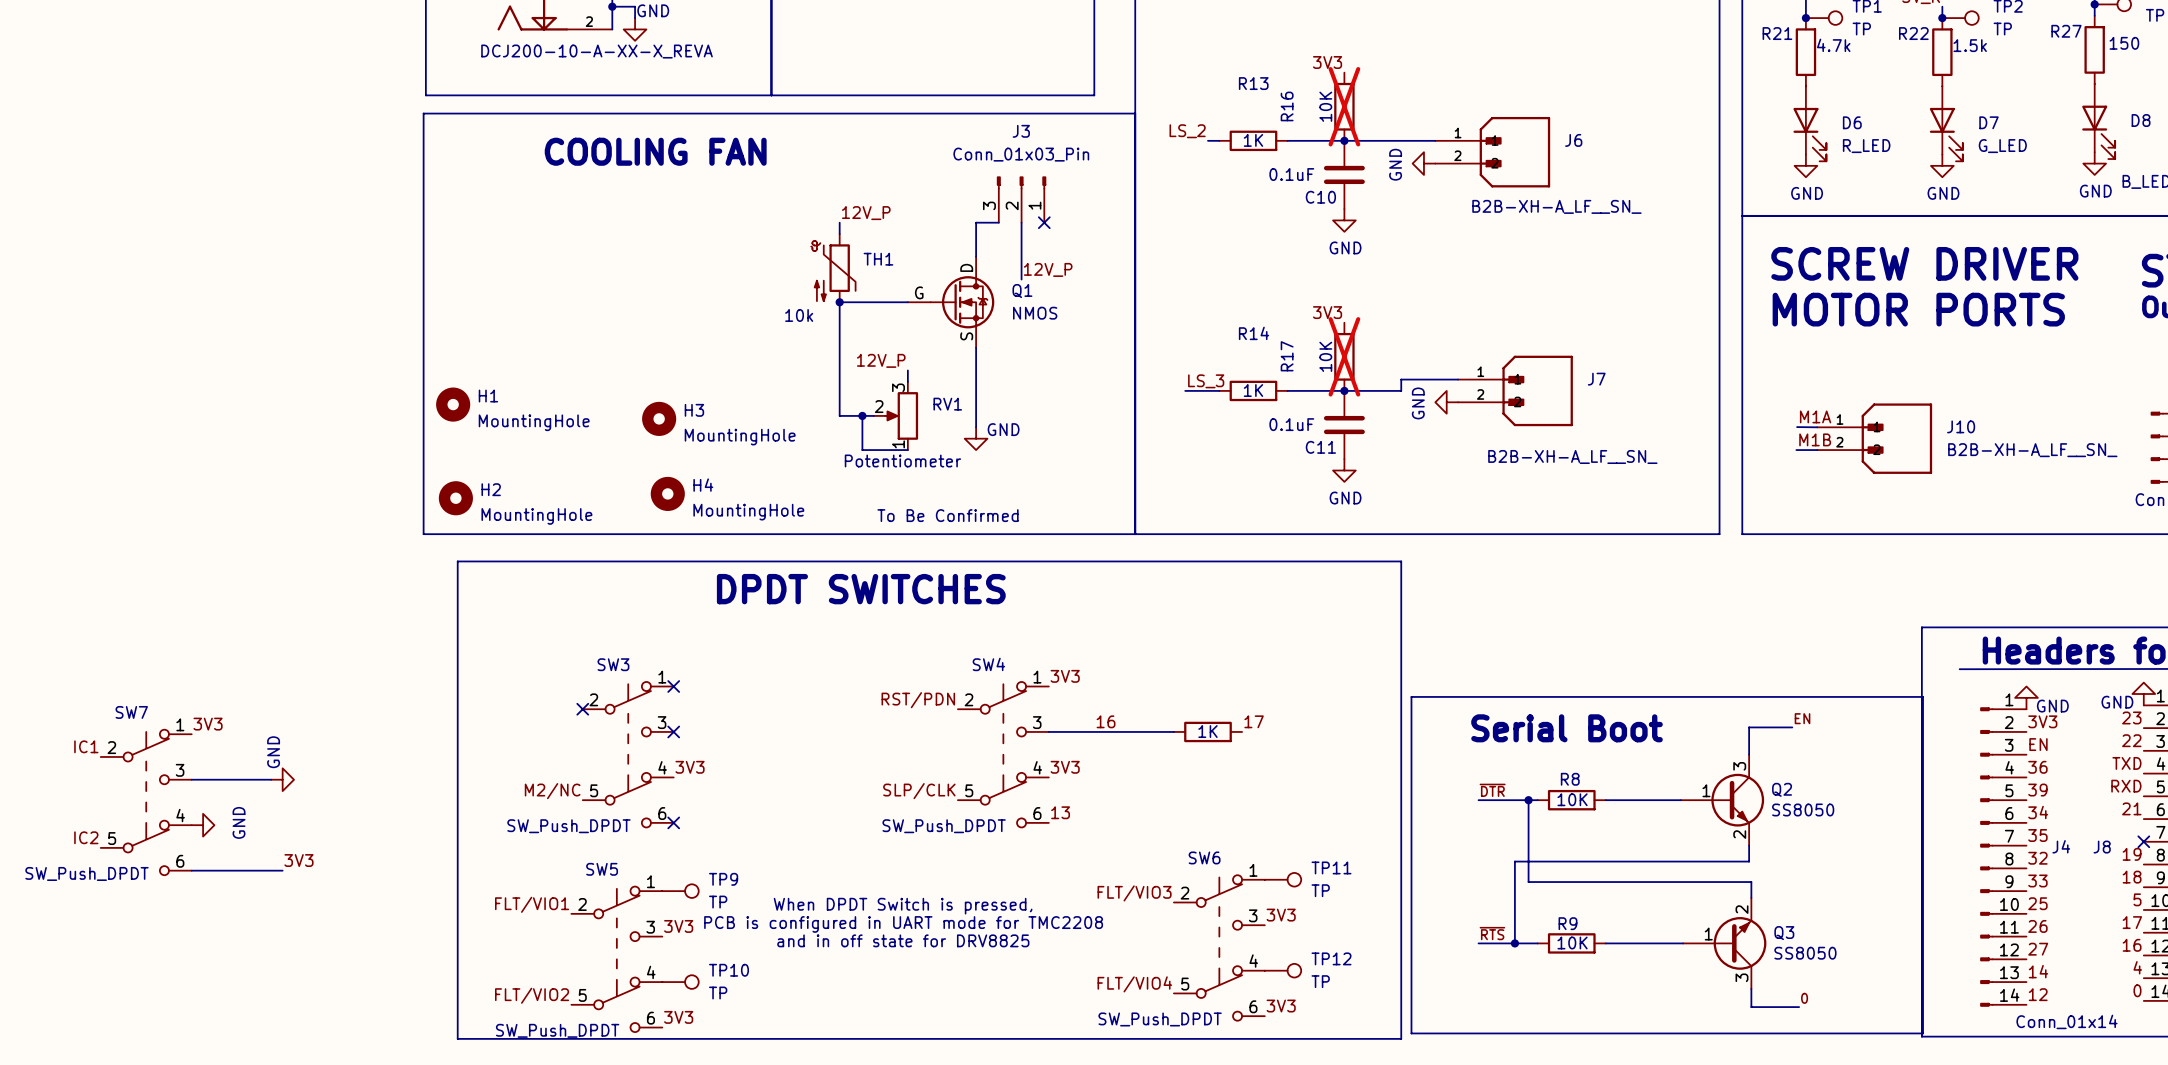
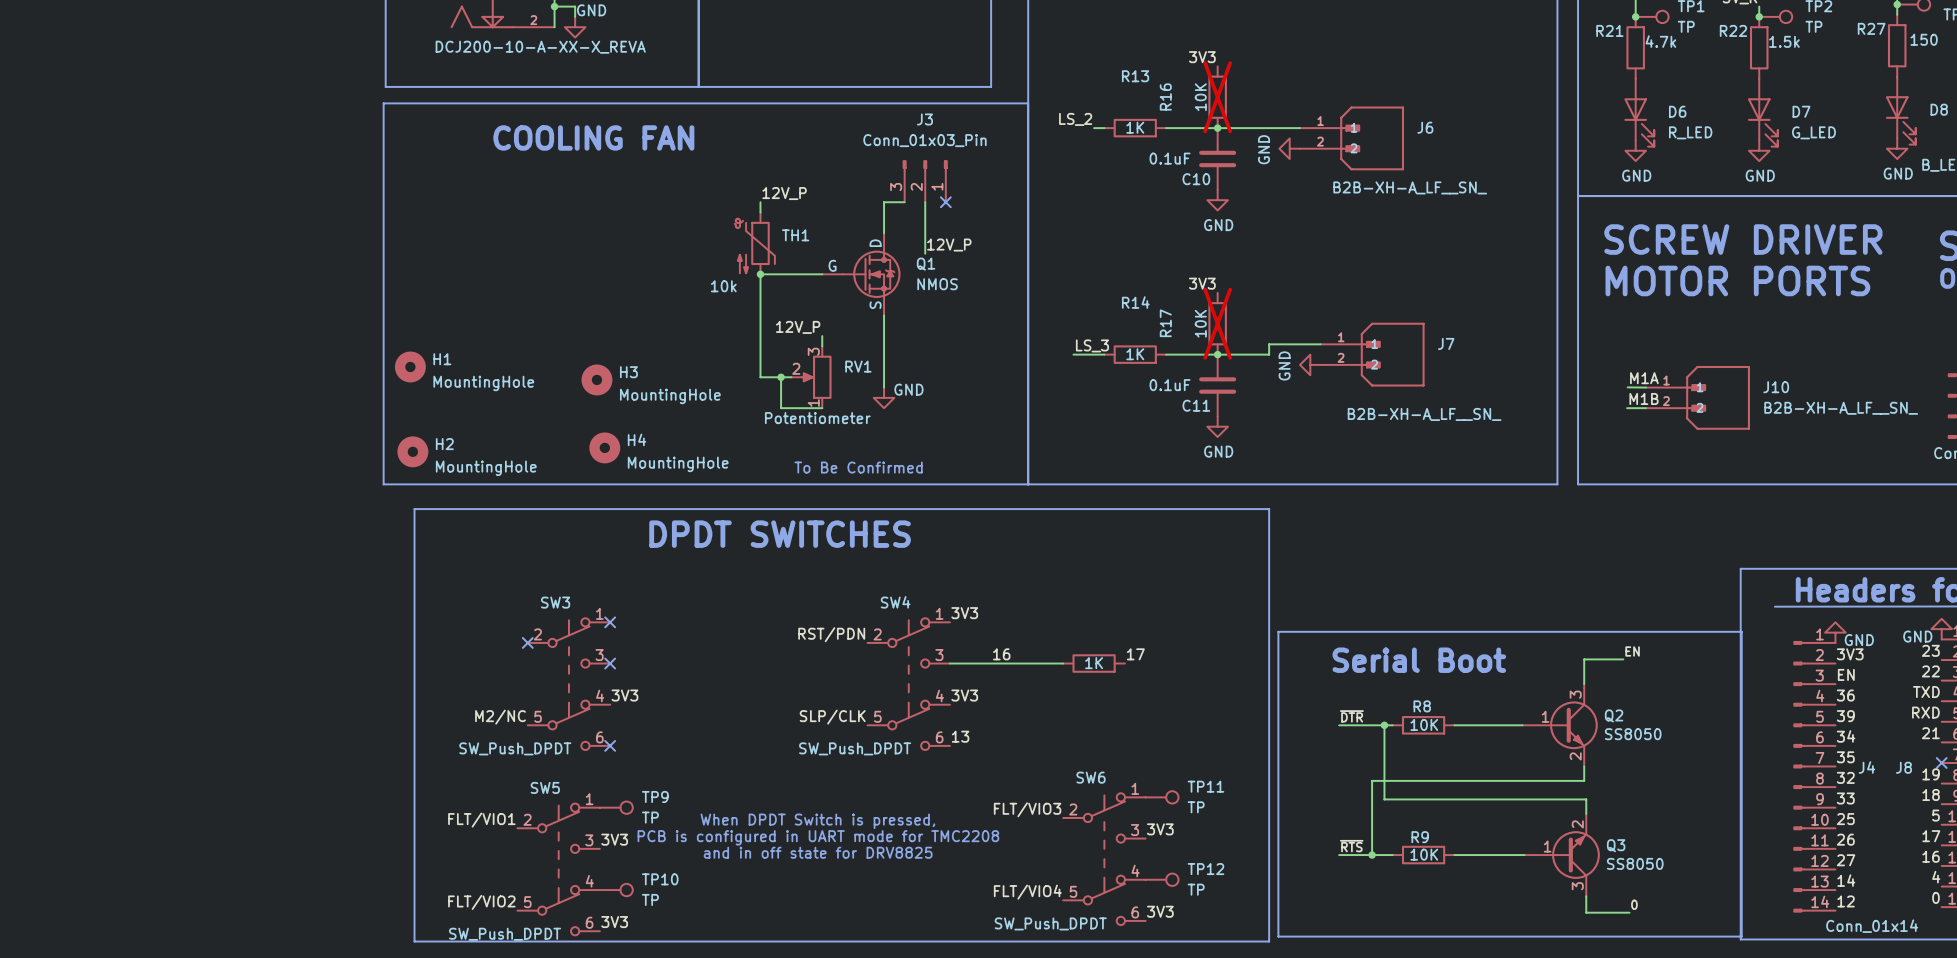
label: 3V3 (208, 724) -> none
label: IC1 (86, 746) -> none
wire: (191, 779) (271, 779) -> none
power symbol: GND (282, 779) -> none
SW7: SW_Push_DPDT (146, 802) -> none
power symbol: GND (203, 825) -> none
label: IC2 (86, 837) -> none
label: 3V3 (298, 860) -> none
wire: (191, 870) (282, 870) -> none

